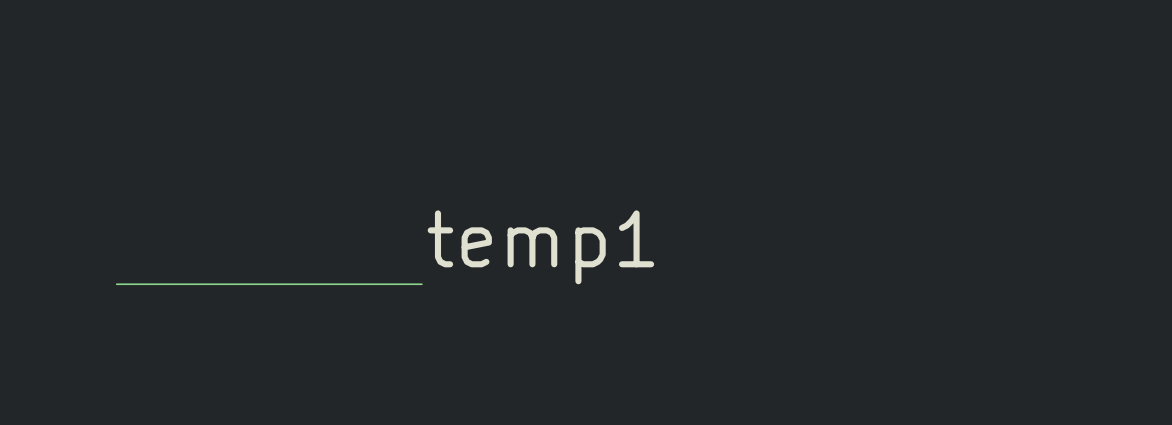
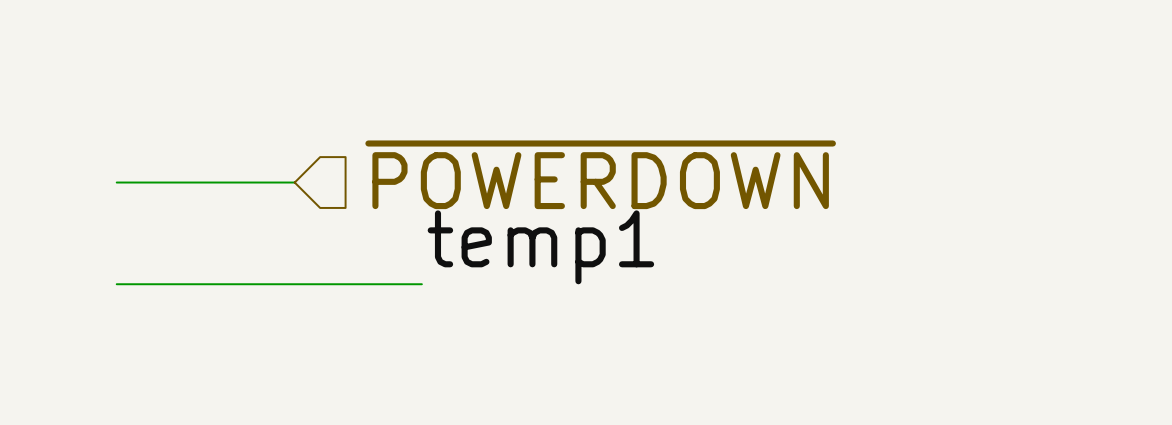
hierarchical label: none -> ~{POWERDOWN} (600, 174)
wire: none -> (116, 182) (294, 182)

